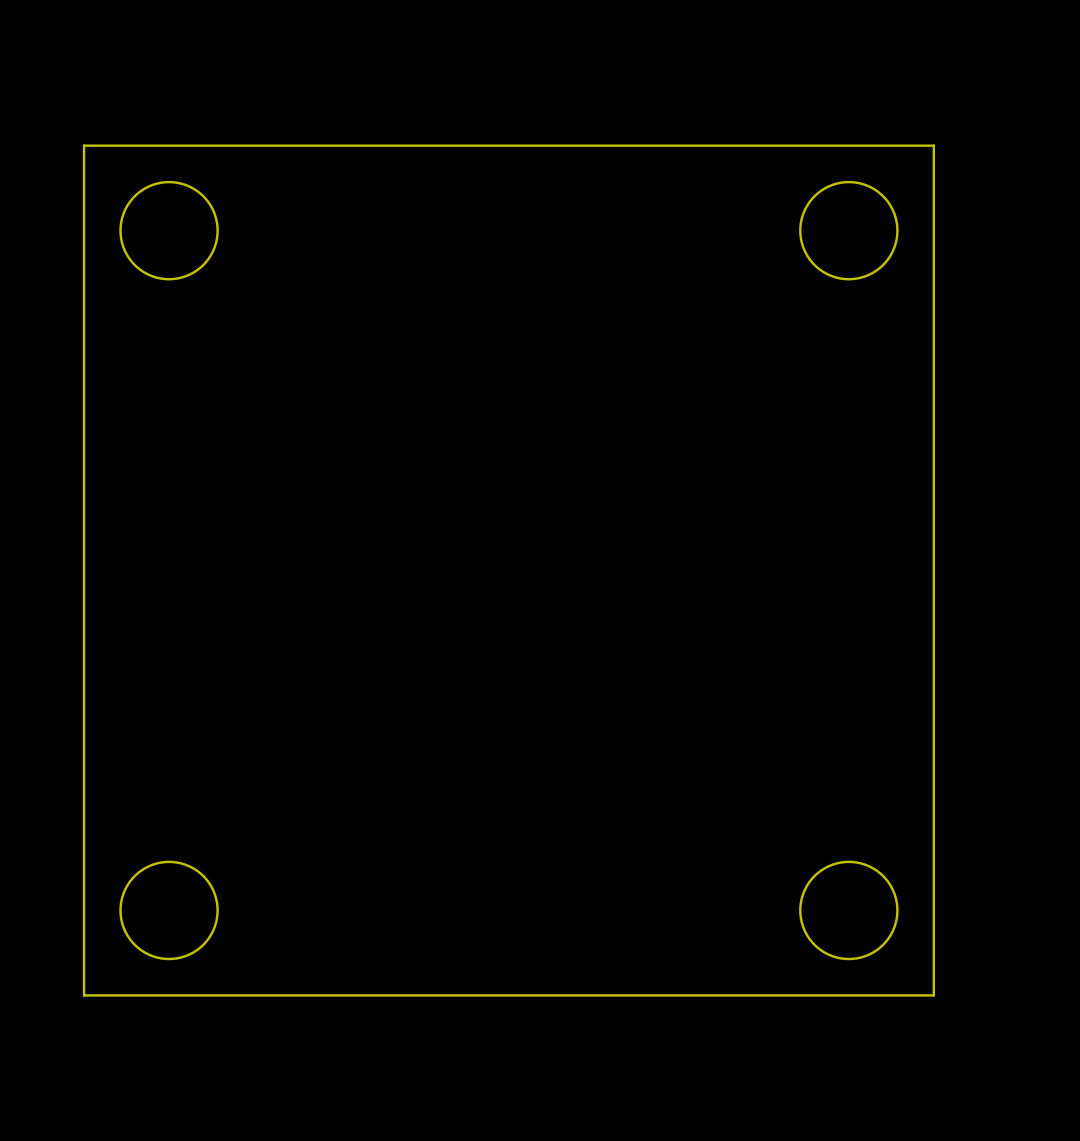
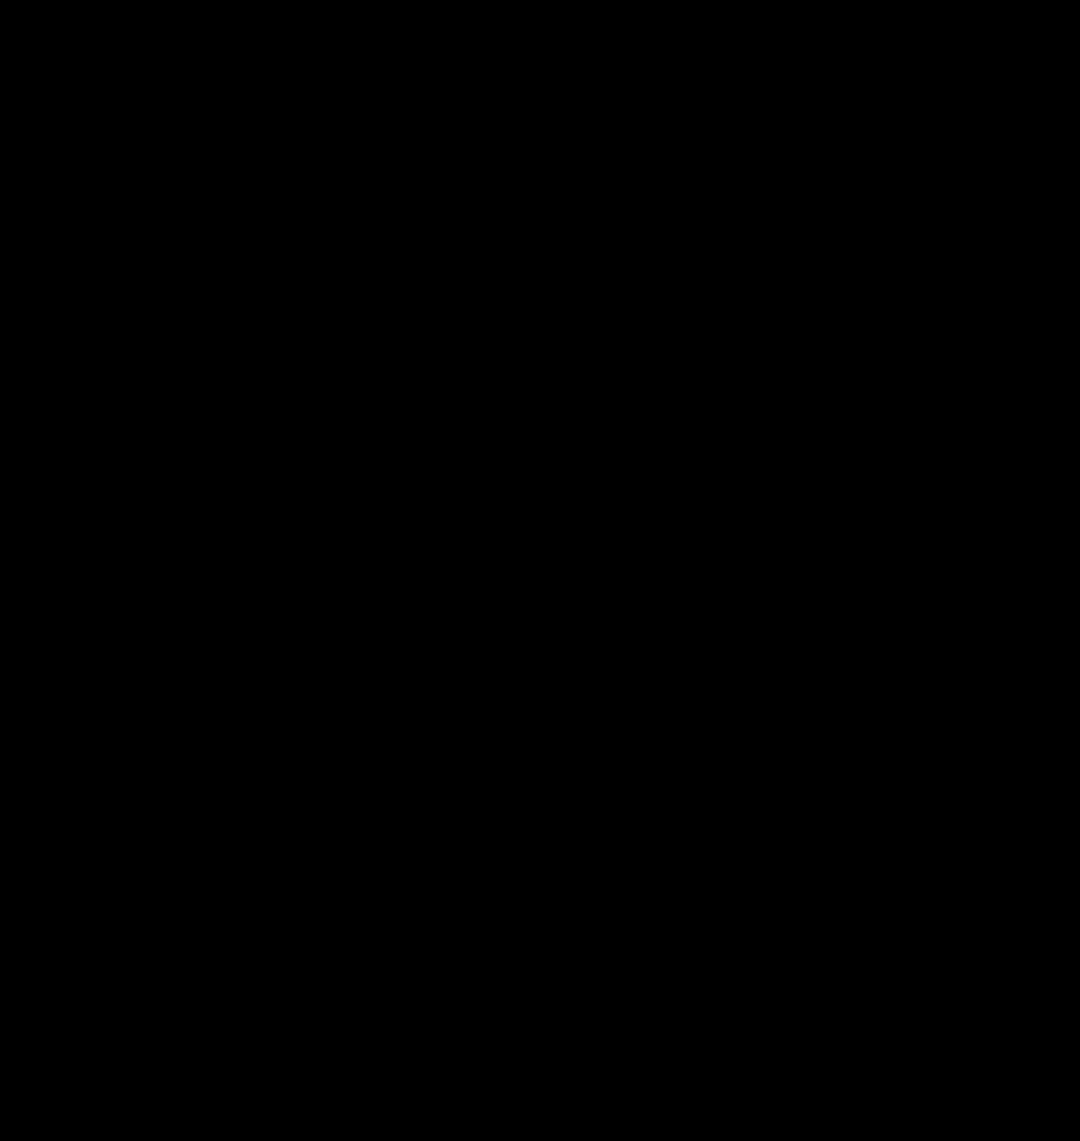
board edge: (84, 145) (84, 995) (933, 995) (933, 145) (84, 145) -> none
round board edge: [119, 180, 219, 281] -> none
round board edge: [799, 180, 899, 281] -> none
round board edge: [119, 860, 219, 961] -> none
round board edge: [799, 860, 899, 961] -> none

